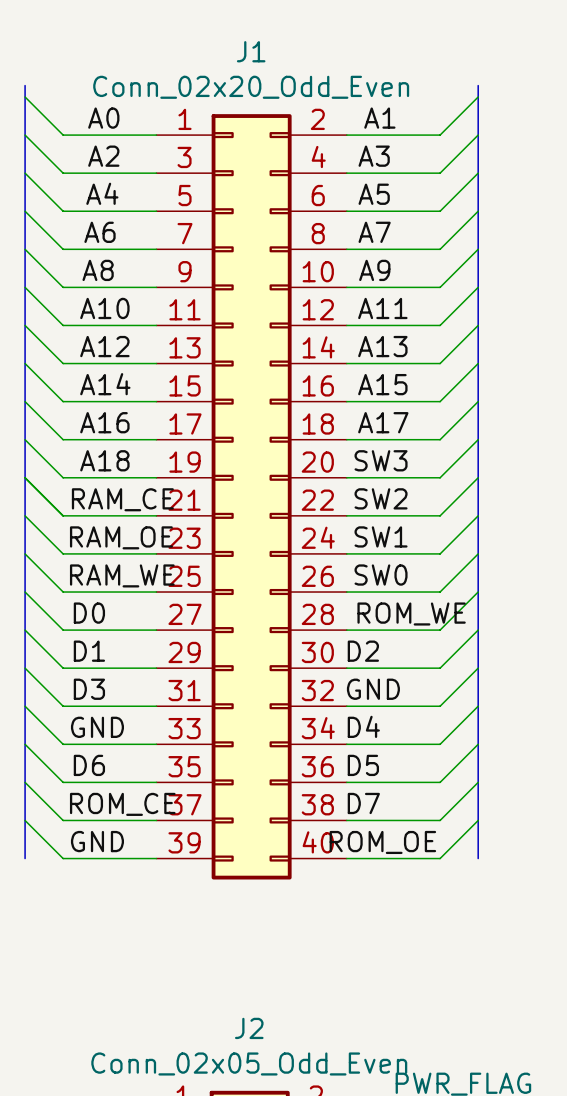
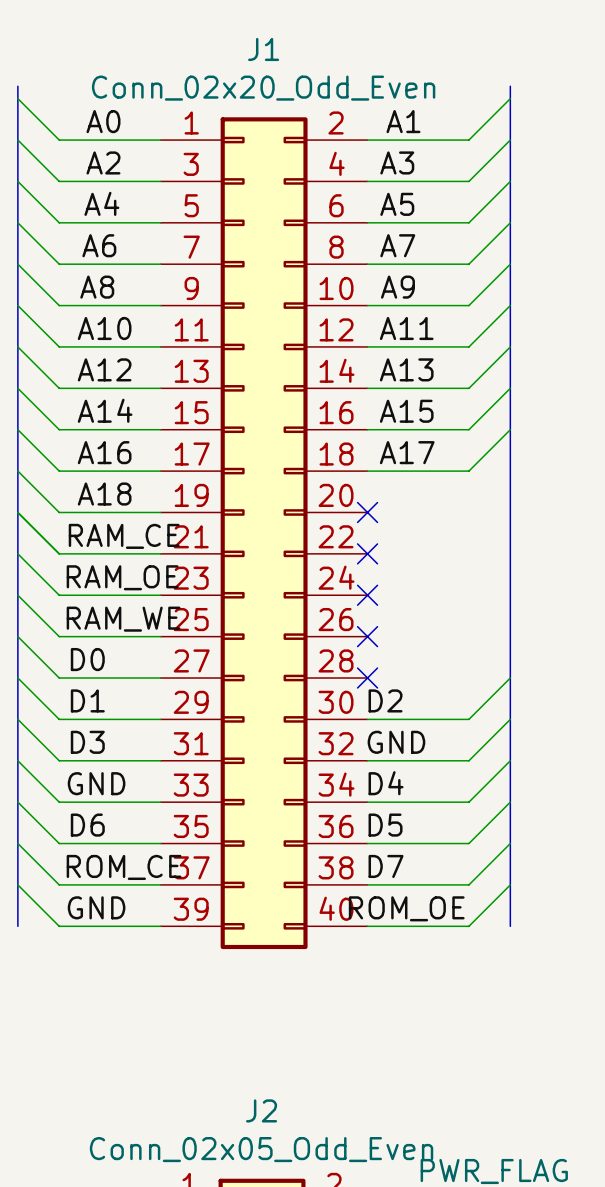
wire: (478, 439) (440, 477) (346, 477) -> none
label: SW3 (381, 460) -> none
no-connect mark: none -> (367, 512)
wire: (478, 477) (440, 515) (346, 515) -> none
label: SW2 (381, 498) -> none
no-connect mark: none -> (367, 553)
wire: (478, 515) (440, 553) (346, 553) -> none
label: SW1 (381, 536) -> none
no-connect mark: none -> (367, 595)
wire: (478, 553) (440, 592) (346, 592) -> none
label: SW0 (381, 575) -> none
no-connect mark: none -> (367, 636)
wire: (478, 592) (440, 630) (346, 630) -> none
label: ROM_WE (411, 614) -> none
no-connect mark: none -> (367, 678)

